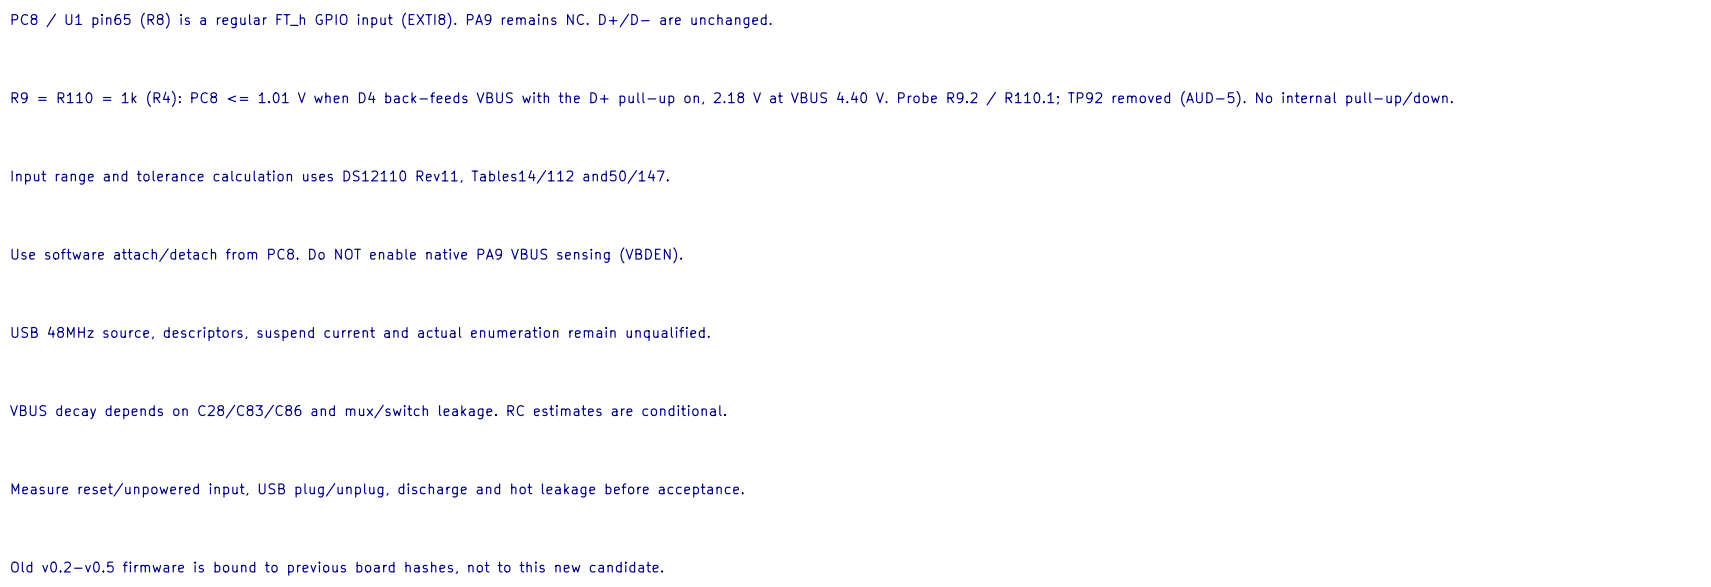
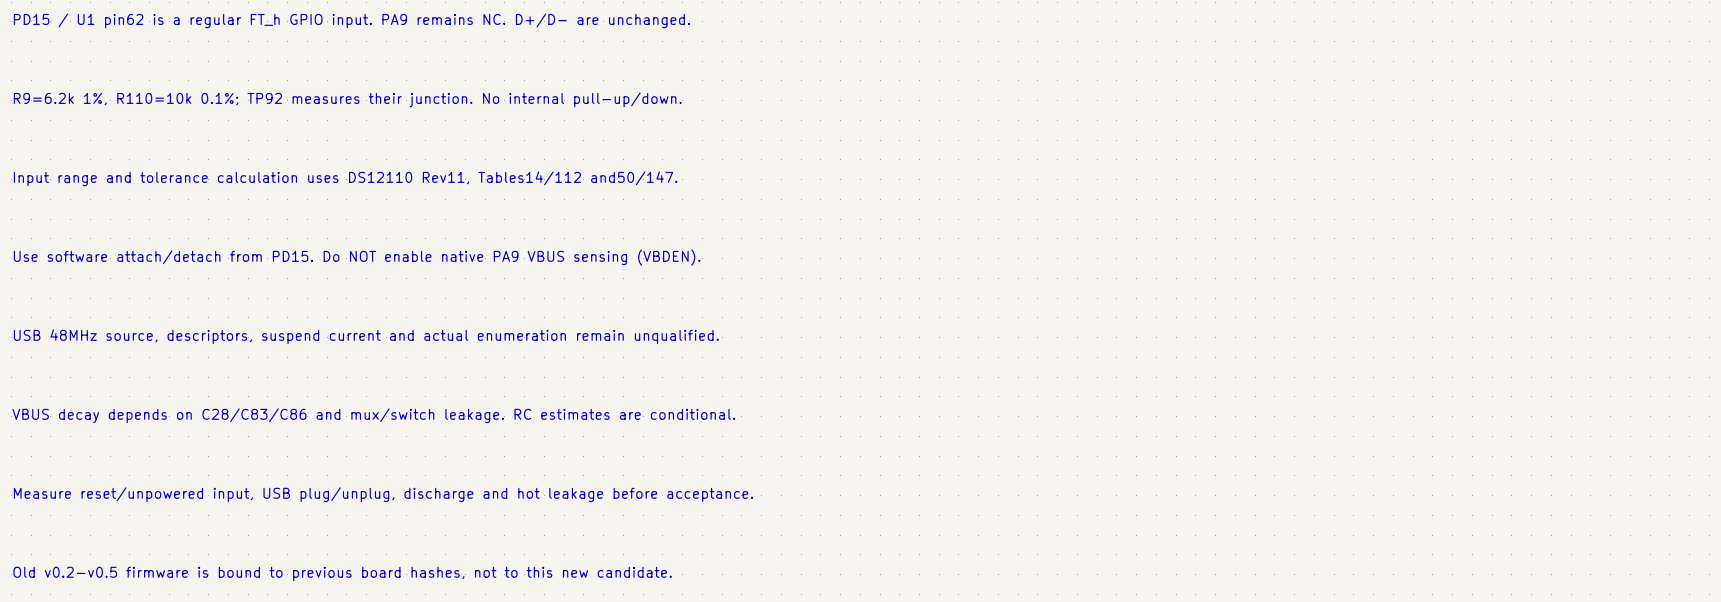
text: PC8 / U1 pin65 (R8) is a regular FT_h GPIO input (EXTI8). PA9 remains NC. D+/D- are unchanged. (391, 20) -> PD15 / U1 pin62 is a regular FT_h GPIO input. PA9 remains NC. D+/D- are unchanged. (351, 20)
text: R9 = R110 = 1k (R4): PC8 <= 1.01 V when D4 back-feeds VBUS with the D+ pull-up on, 2.18 V at VBUS 4.40 V. Probe R9.2 / R110.1; TP92 removed (AUD-5). No internal pull-up/down. (732, 98) -> R9=6.2k 1%, R110=10k 0.1%; TP92 measures their junction. No internal pull-up/down. (347, 99)
text: Use software attach/detach from PC8. Do NOT enable native PA9 VBUS sensing (VBDEN). (346, 255) -> Use software attach/detach from PD15. Do NOT enable native PA9 VBUS sensing (VBDEN). (357, 257)

